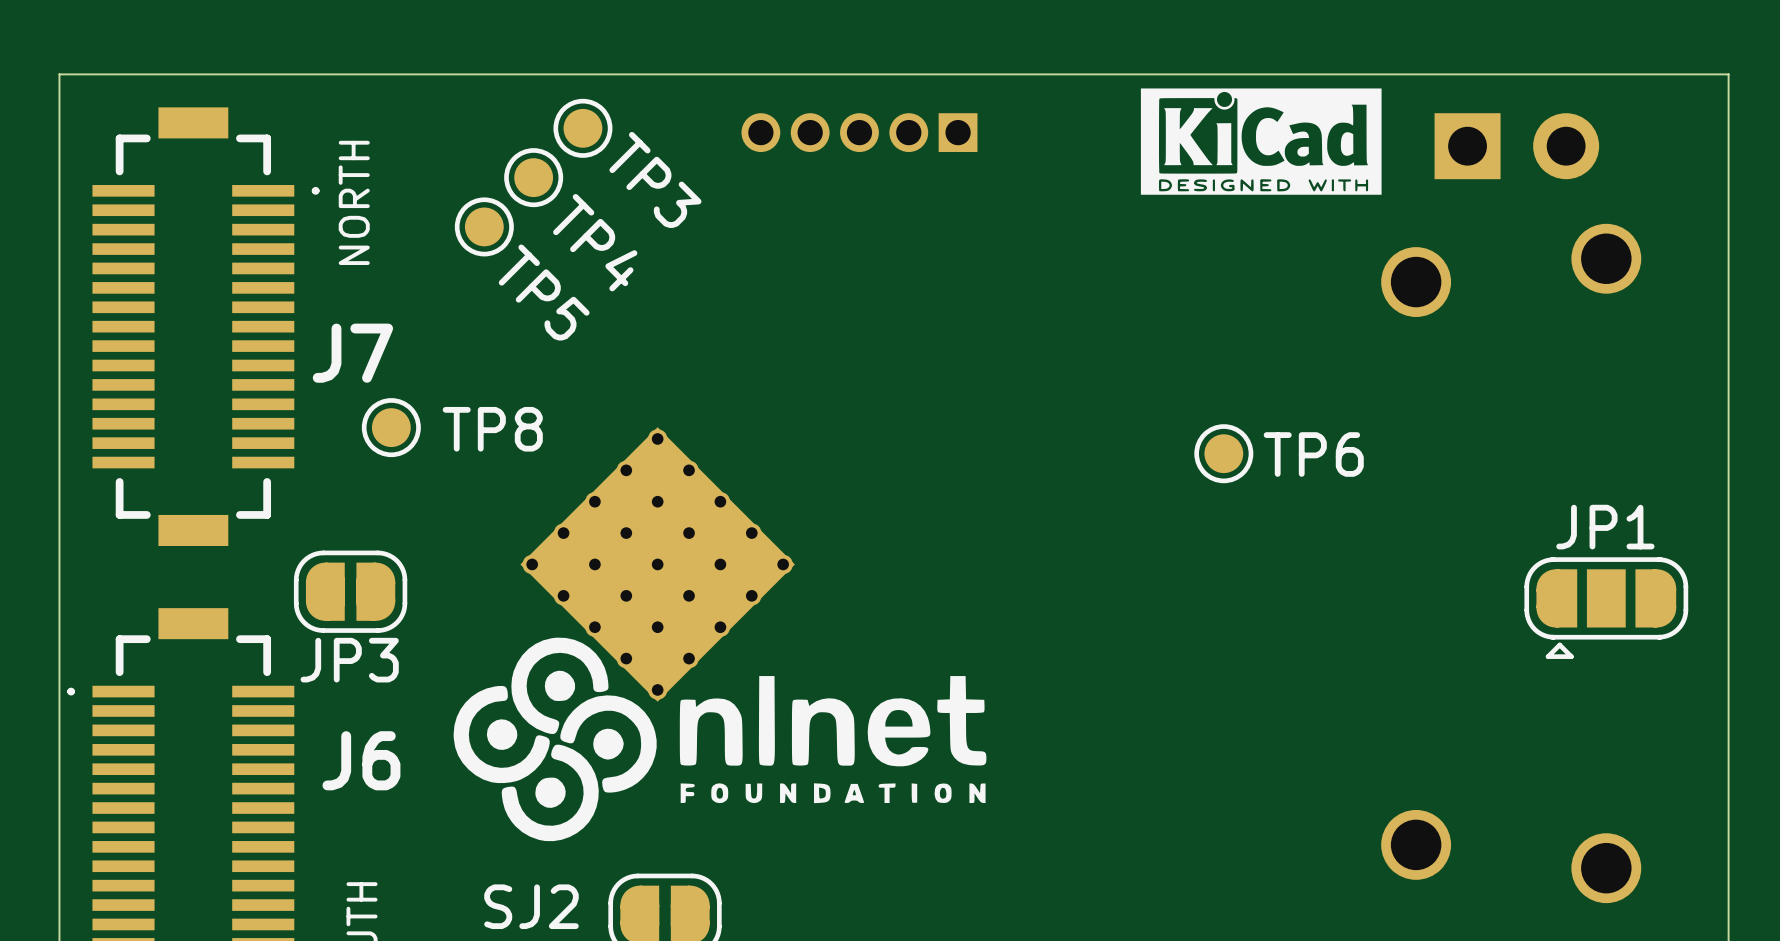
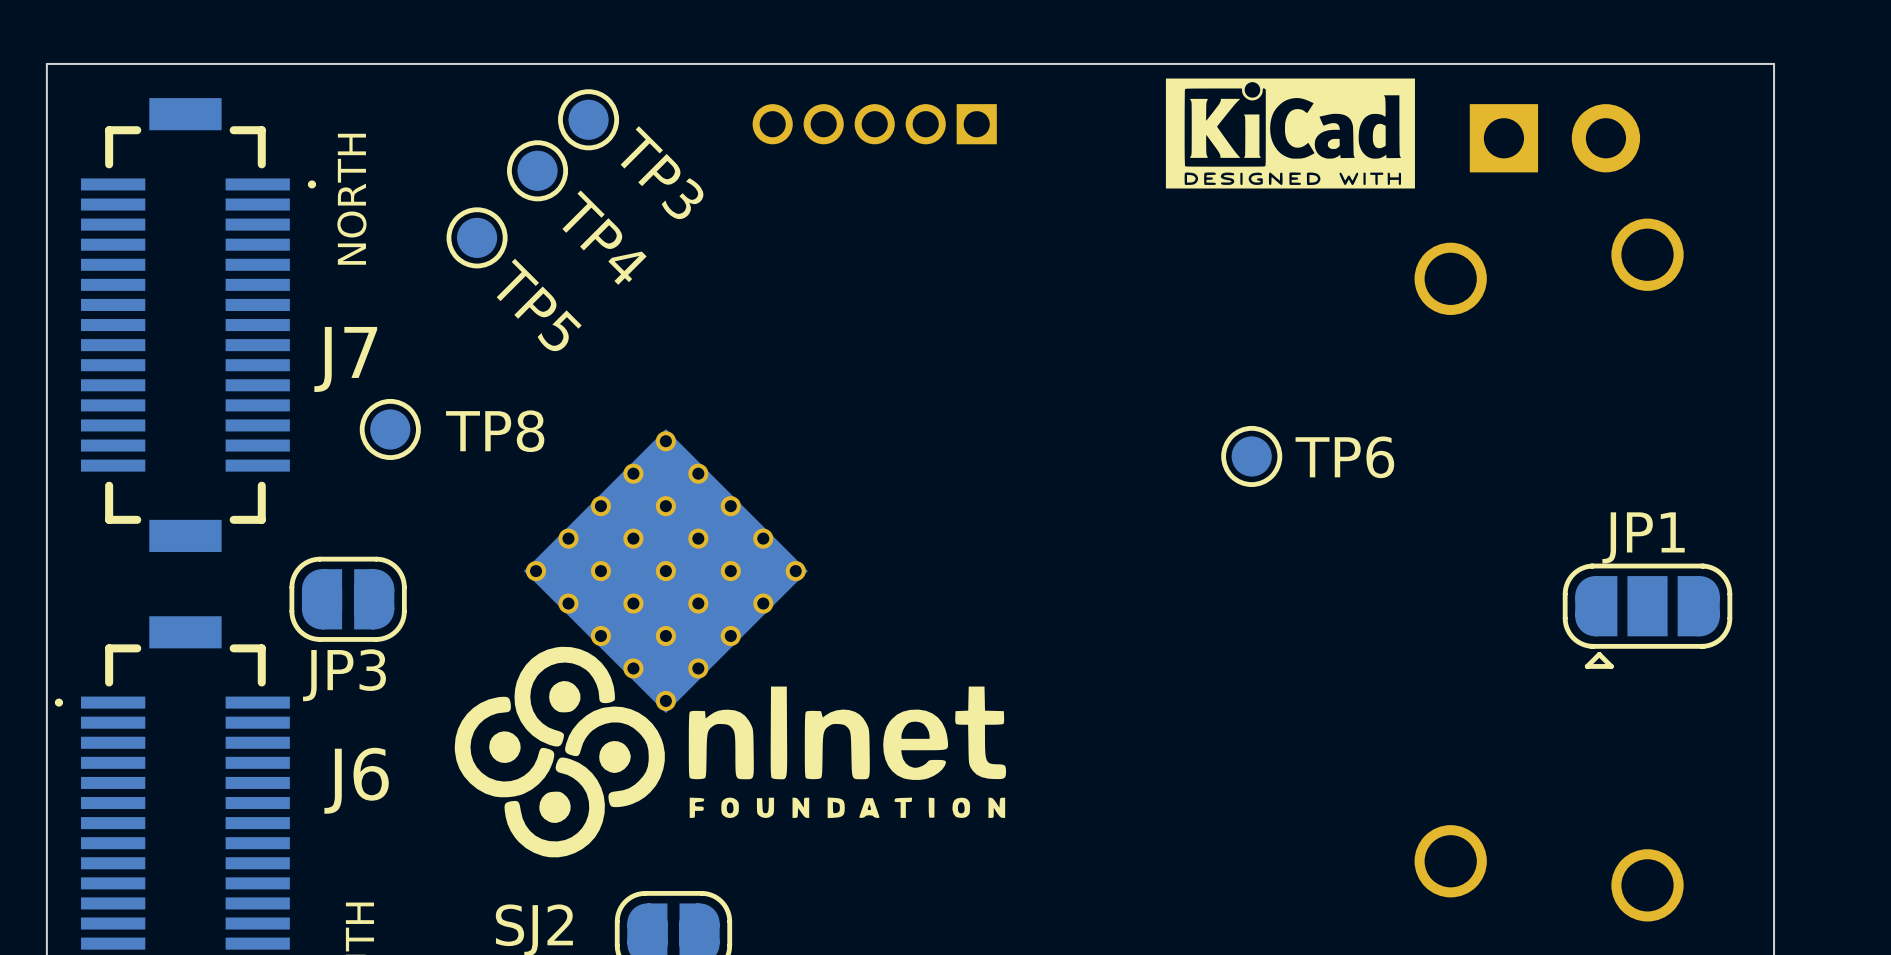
TP5 position: (484, 226) -> (477, 237)

